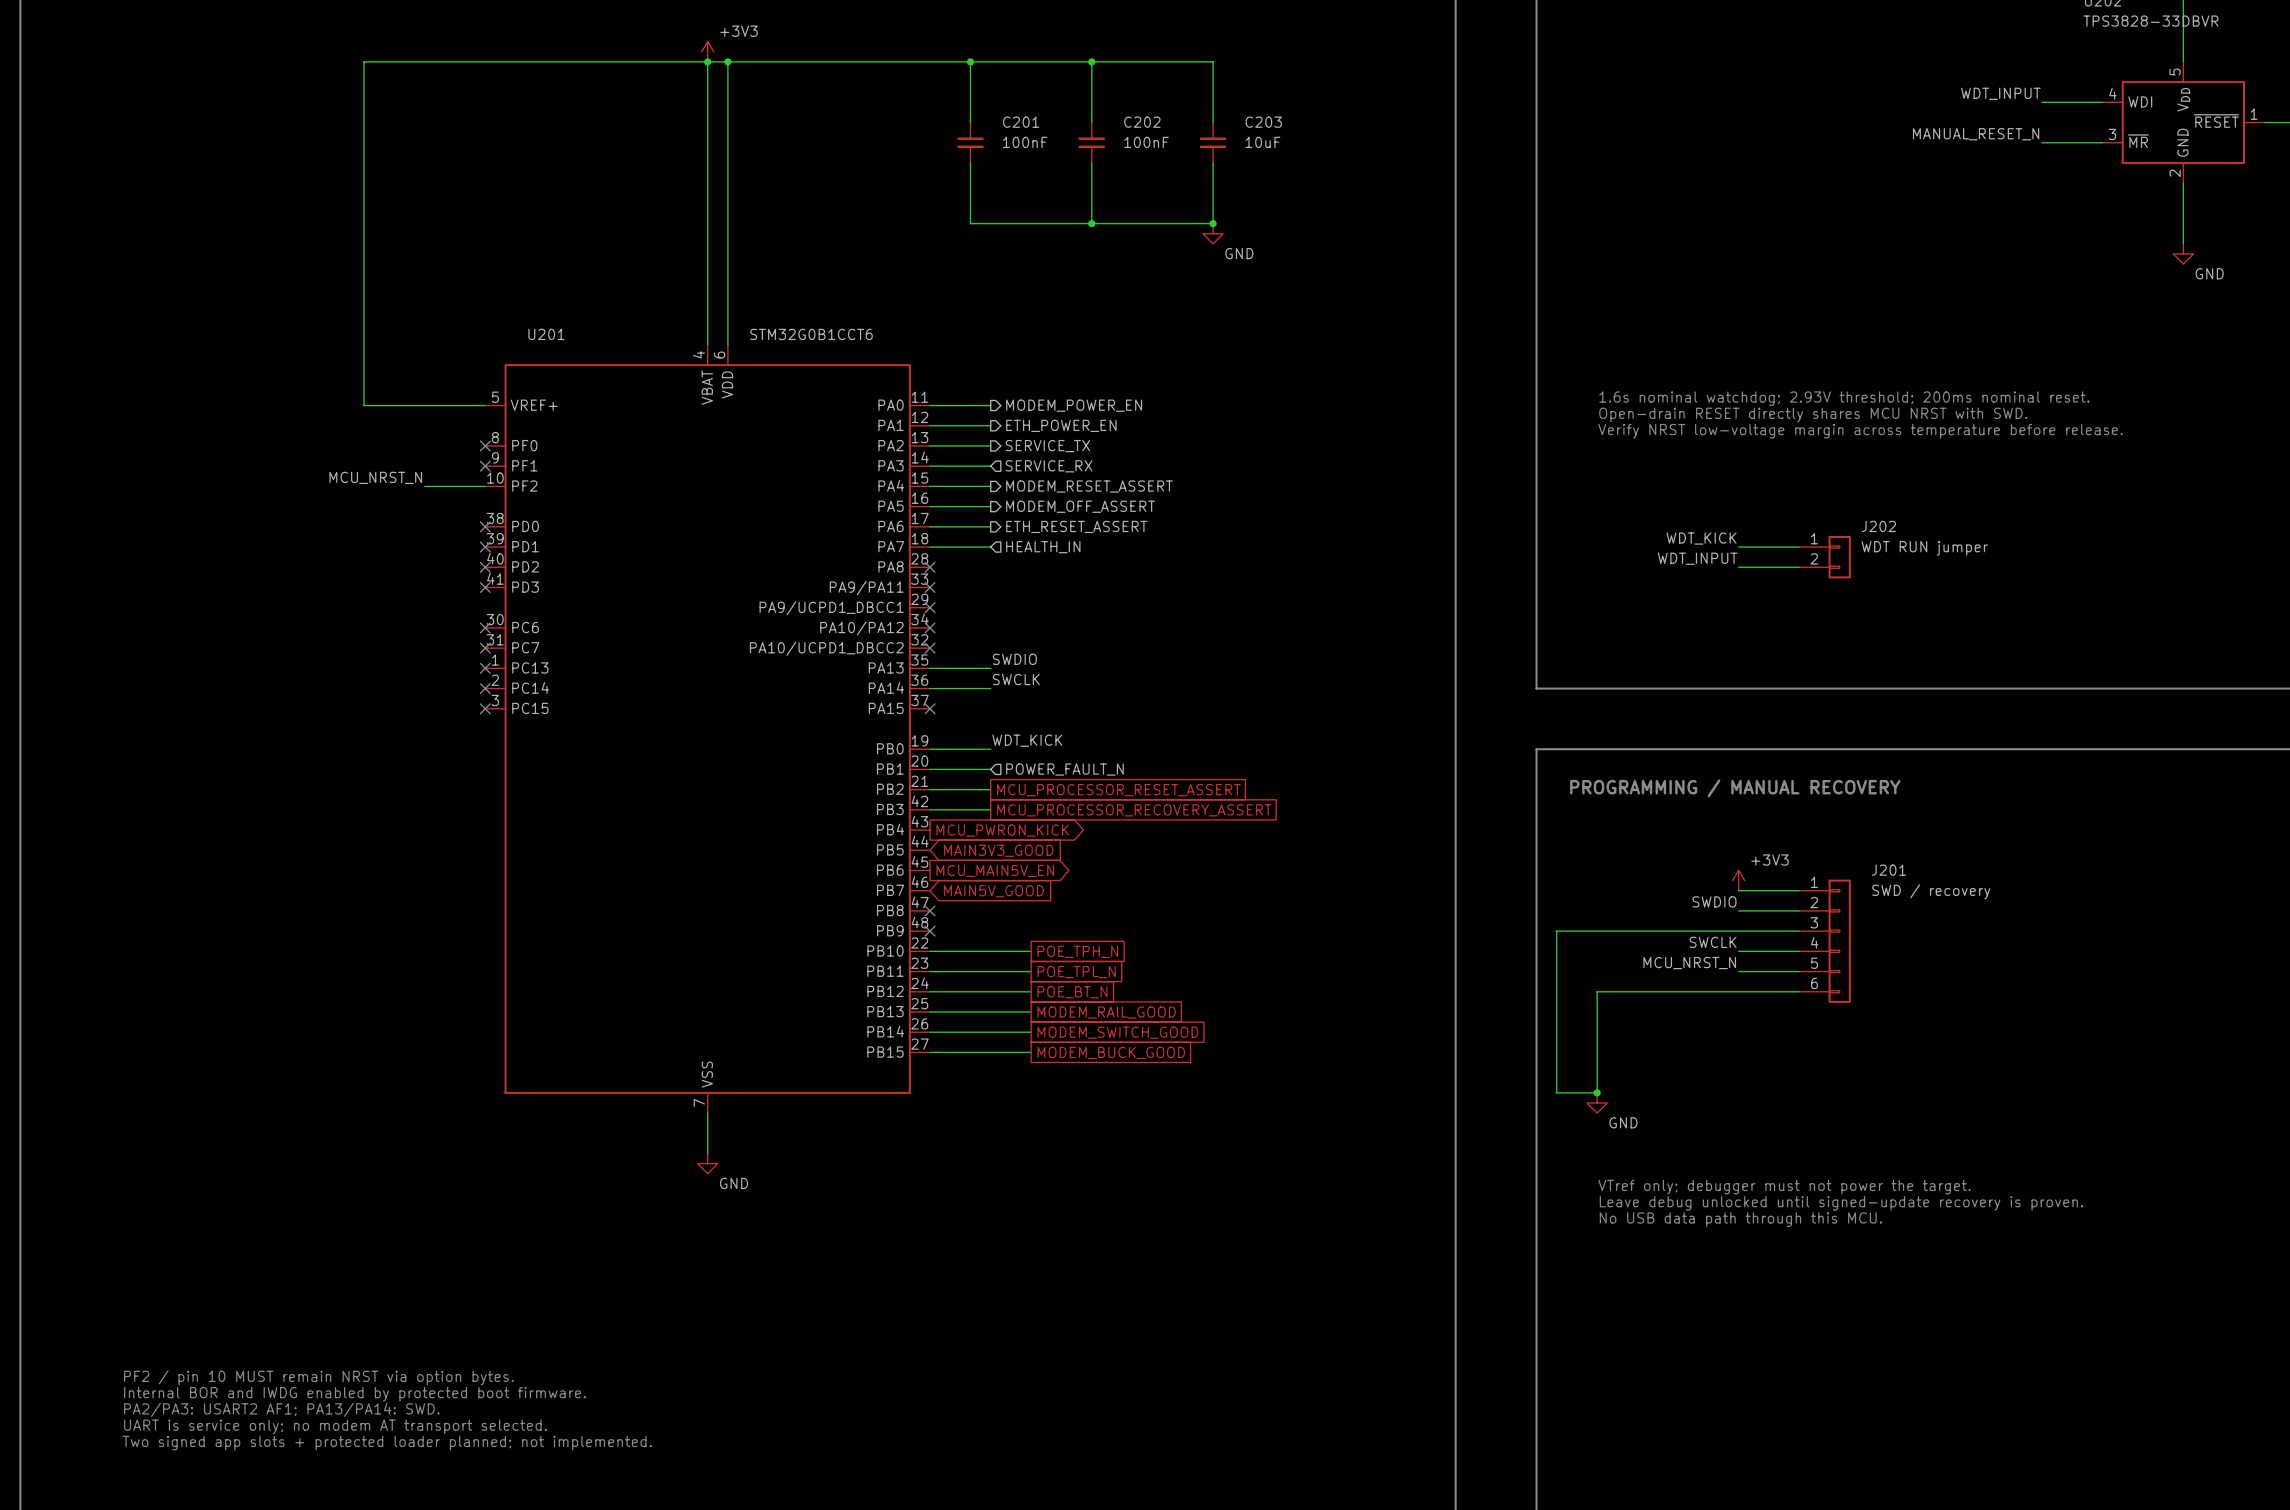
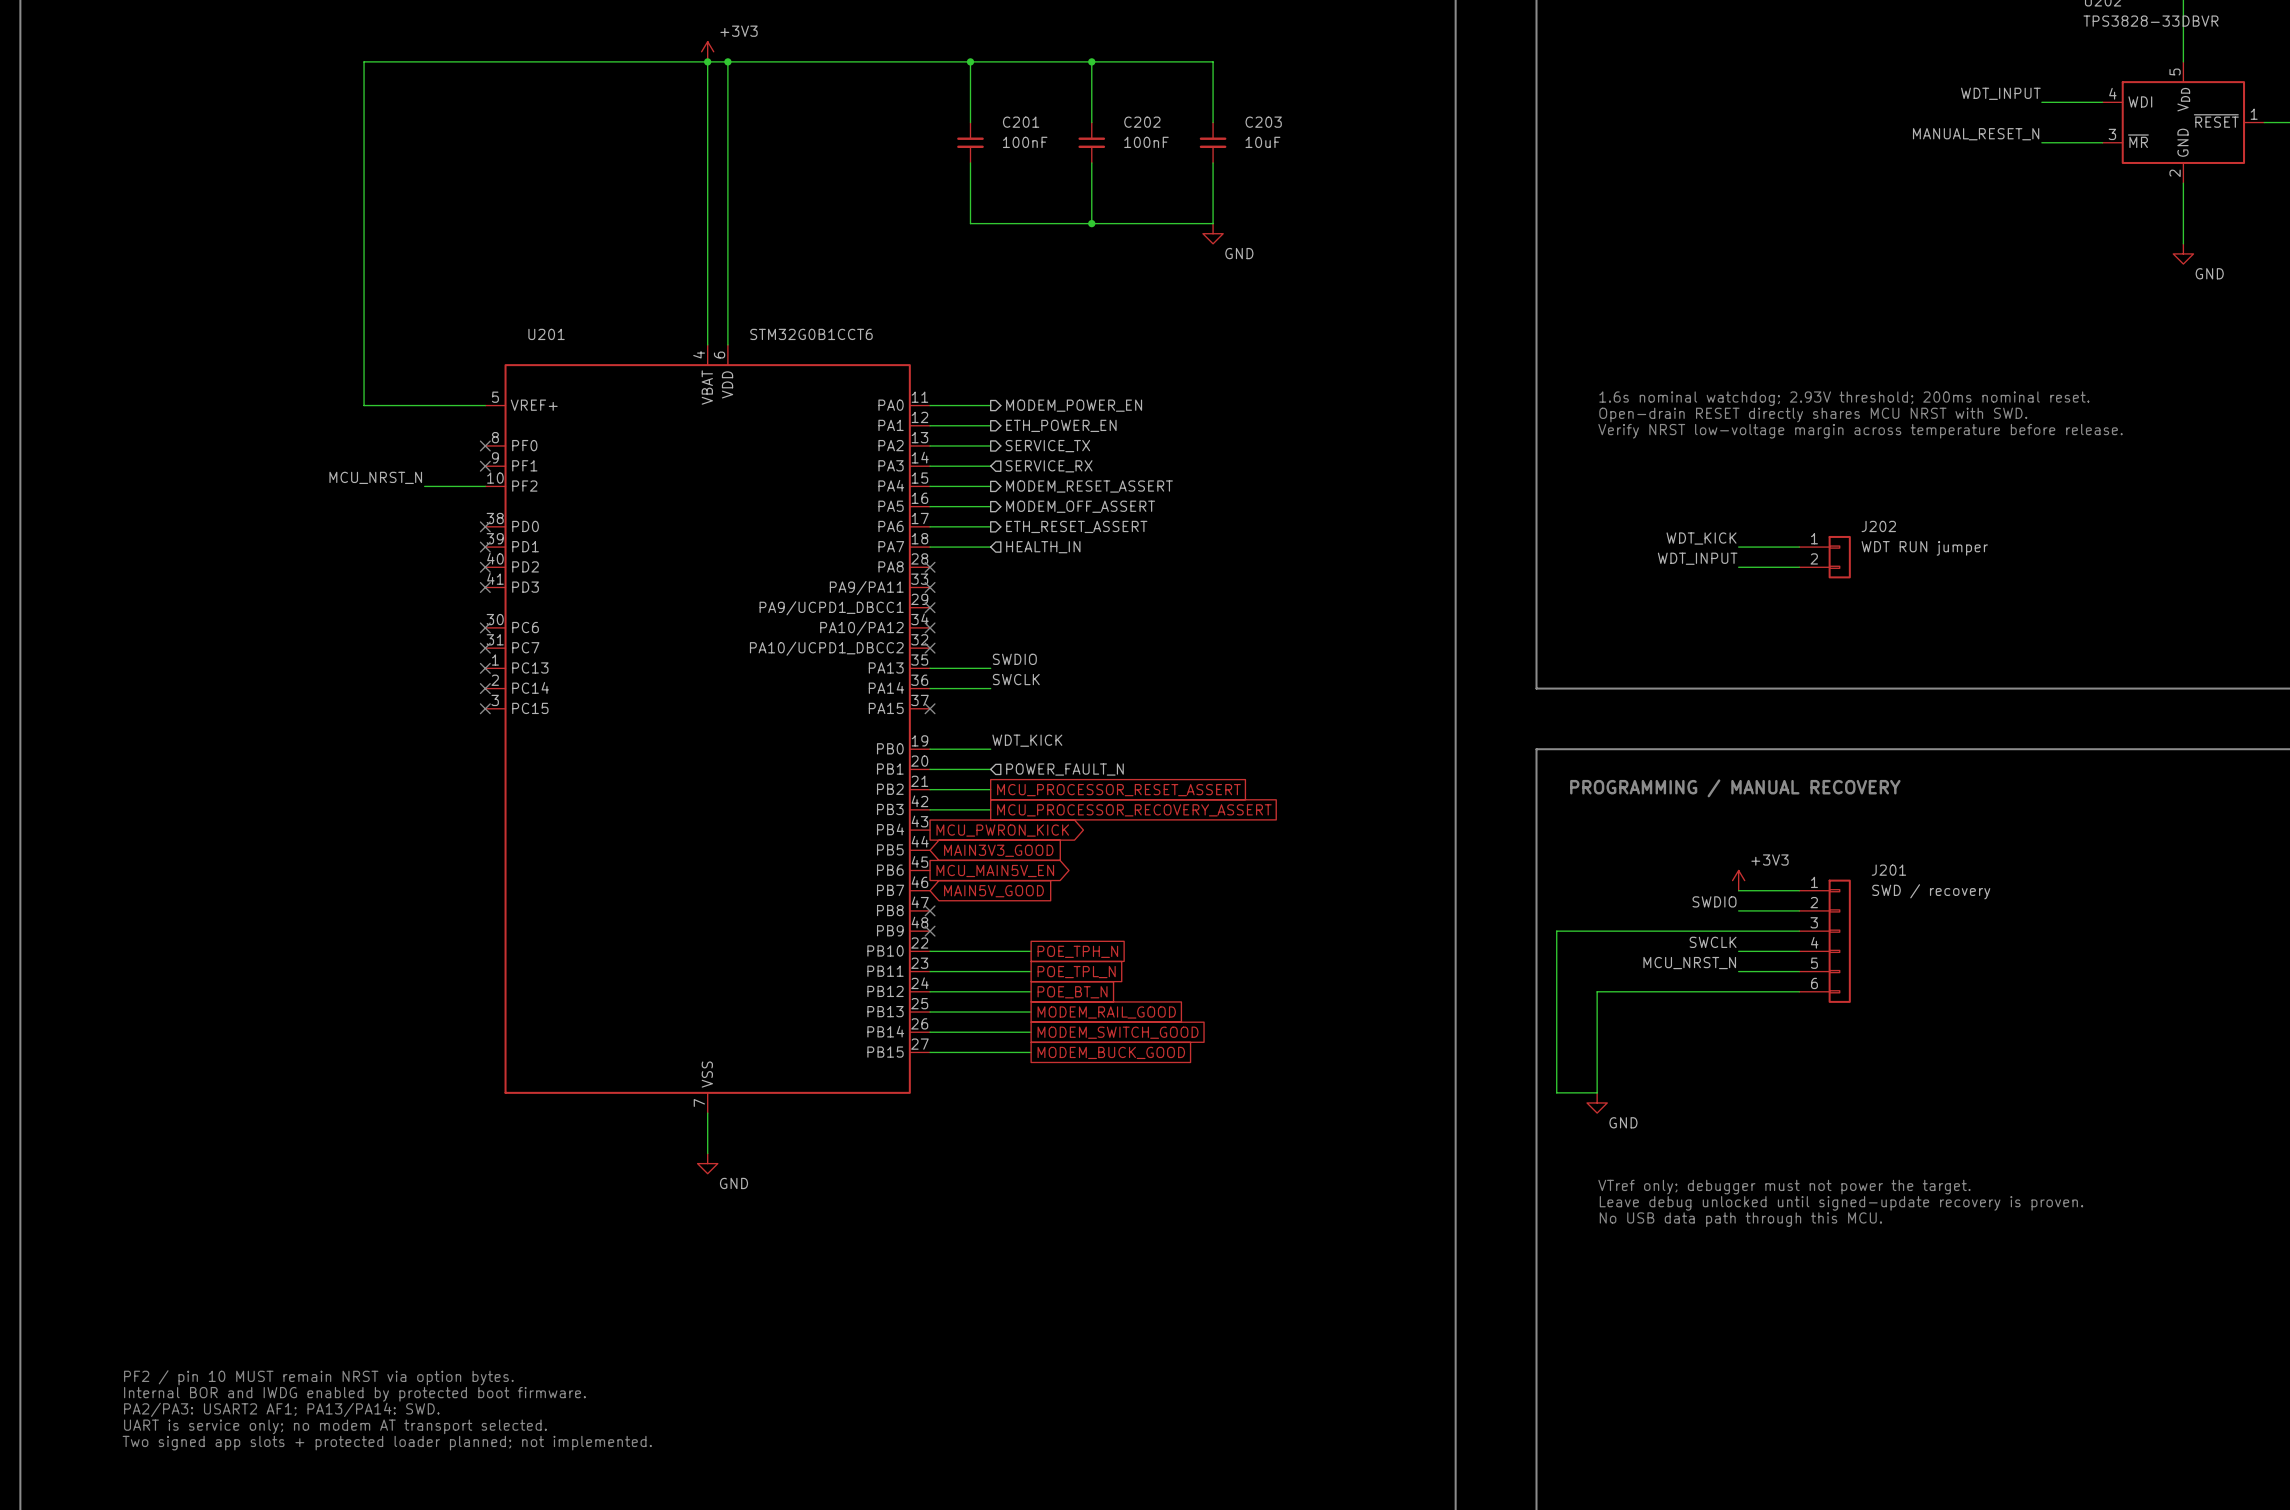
junction: (1213, 223) -> none
junction: (1597, 1092) -> none

